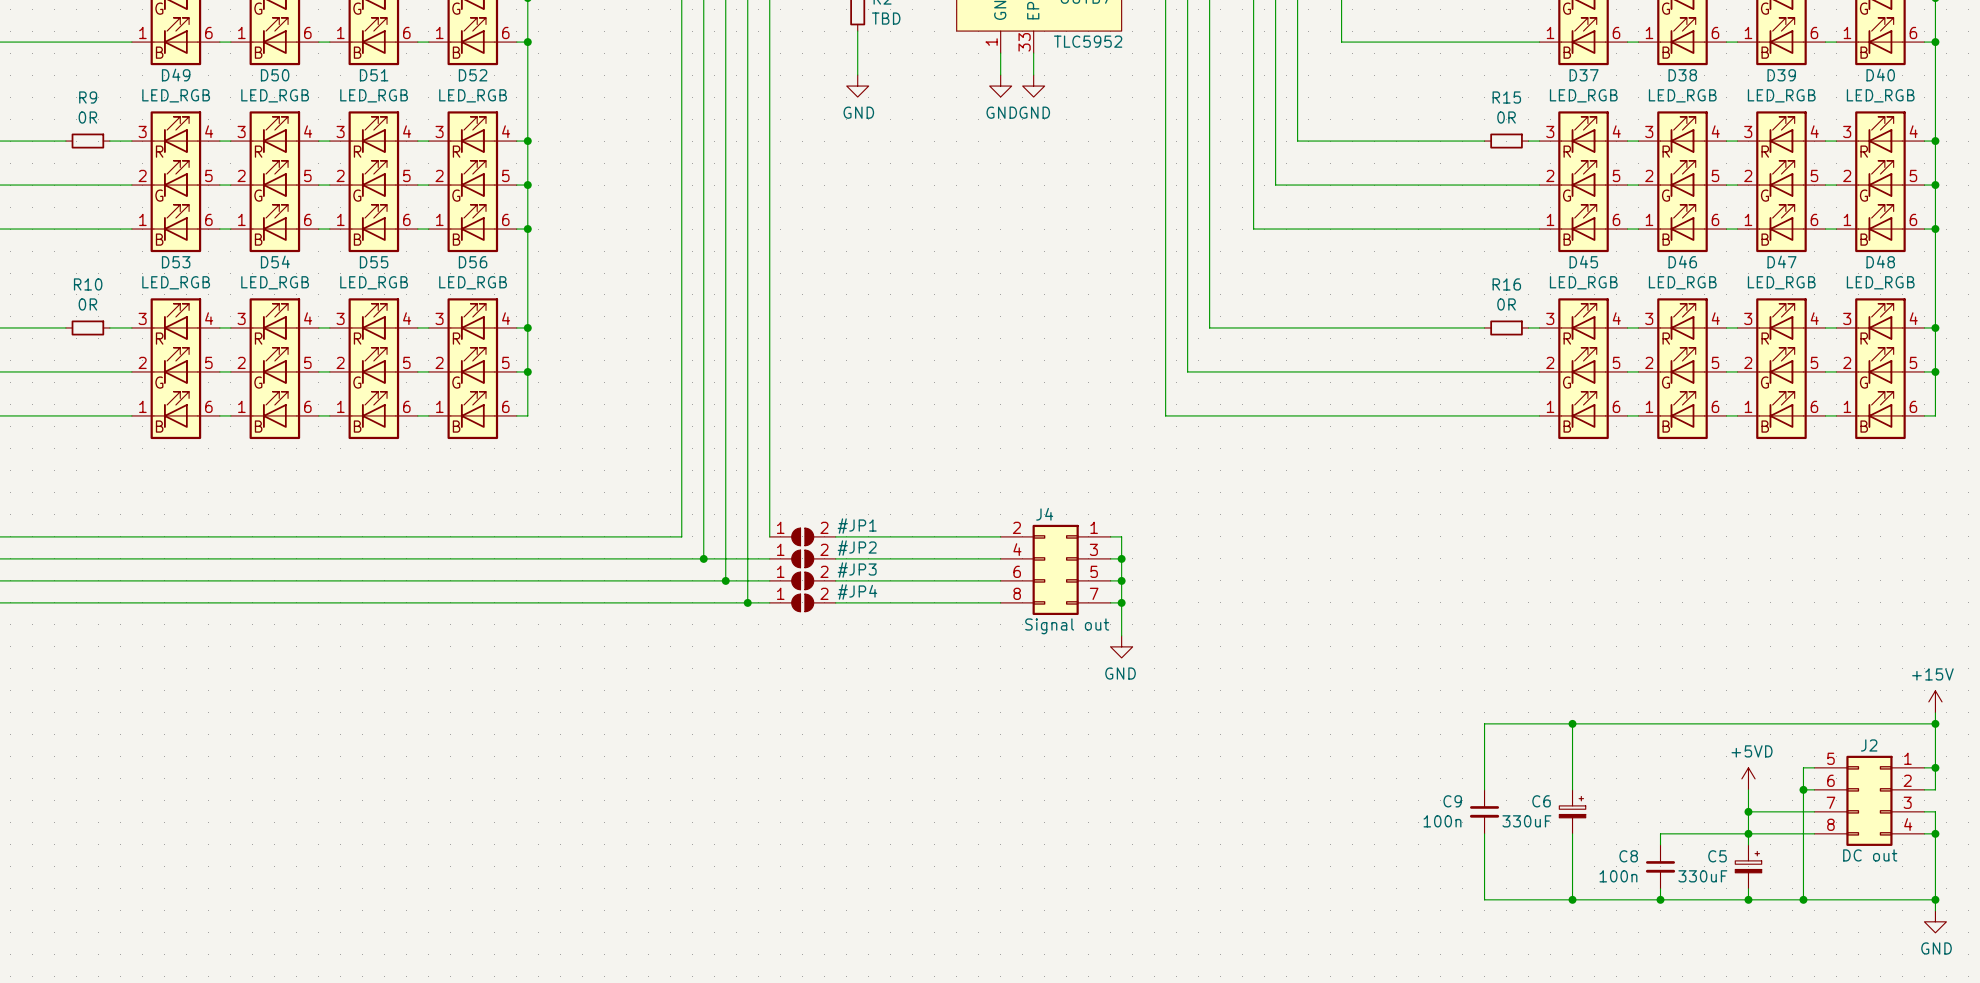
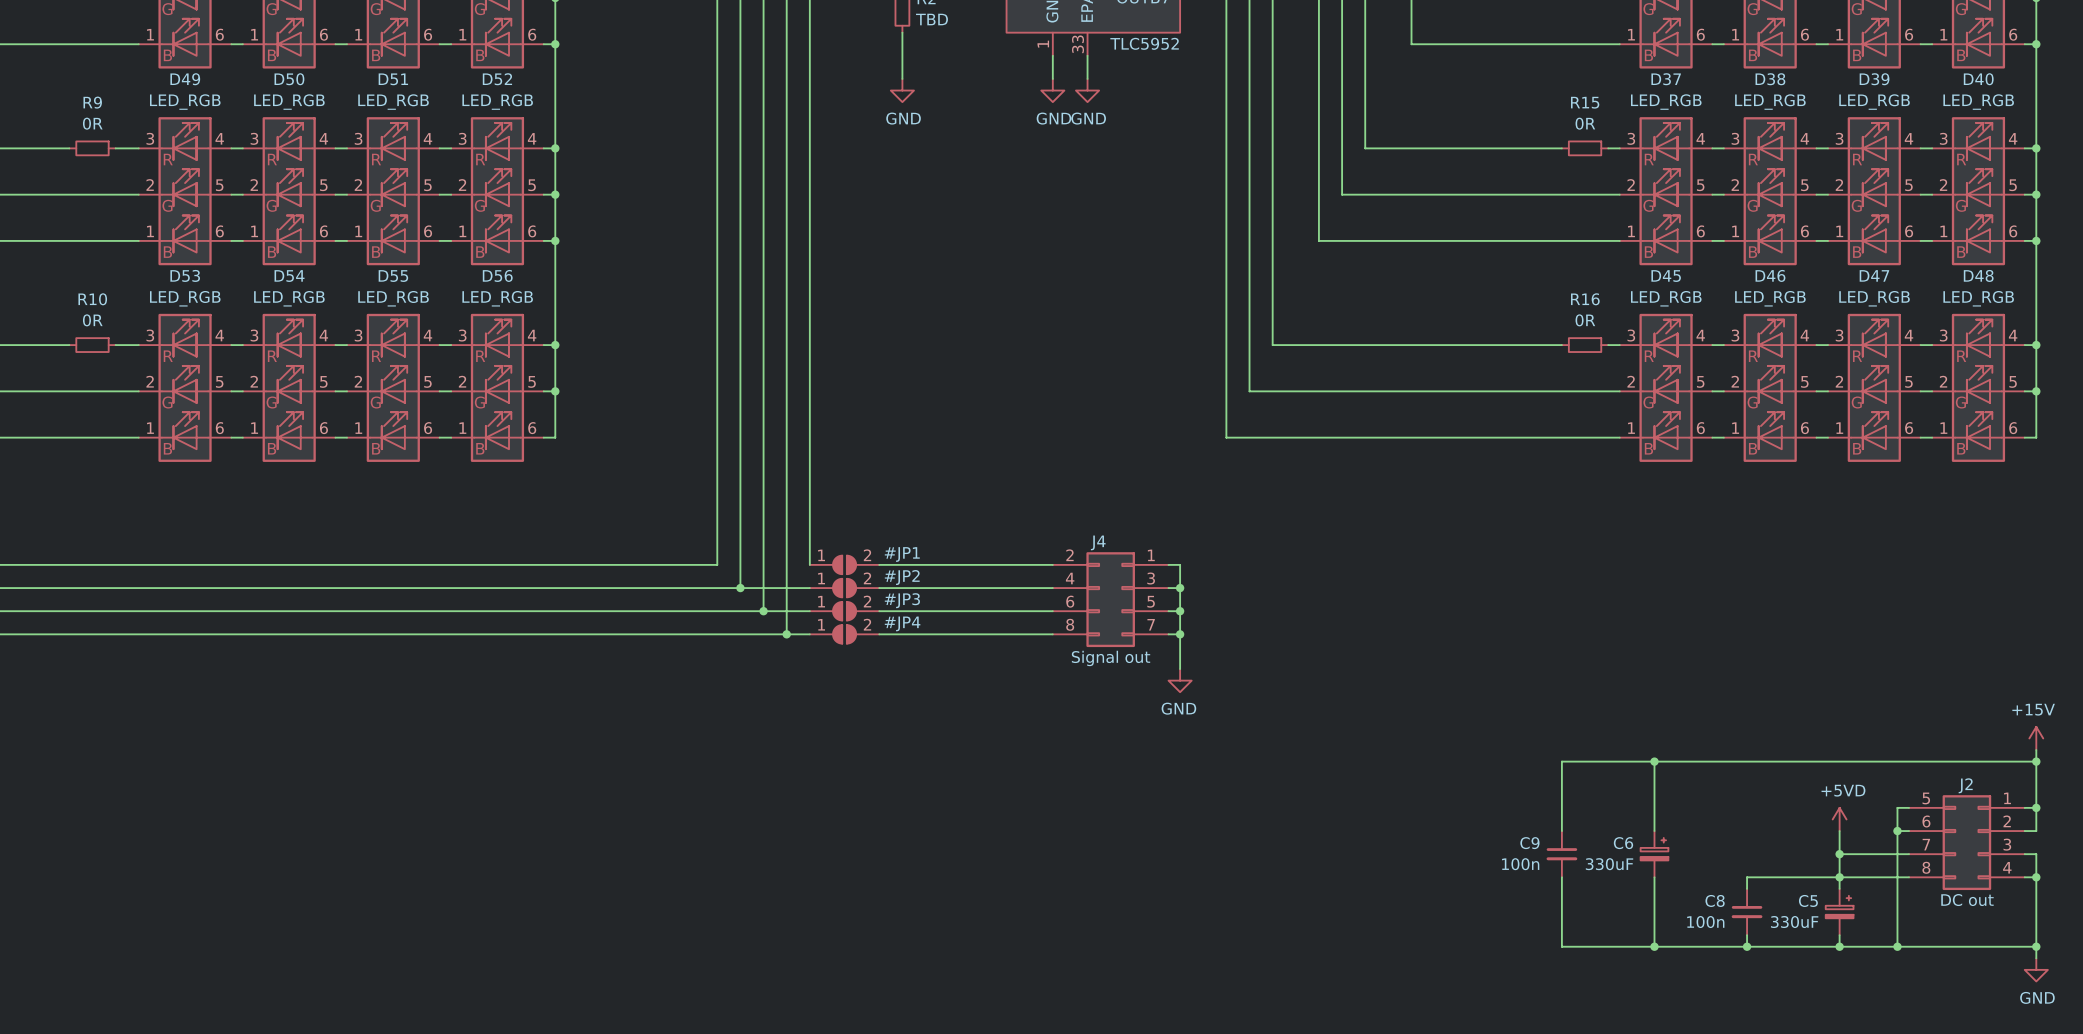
J4 text: none -> Signal out (1111, 658)
J4 value: Signal out (1067, 626) -> none

